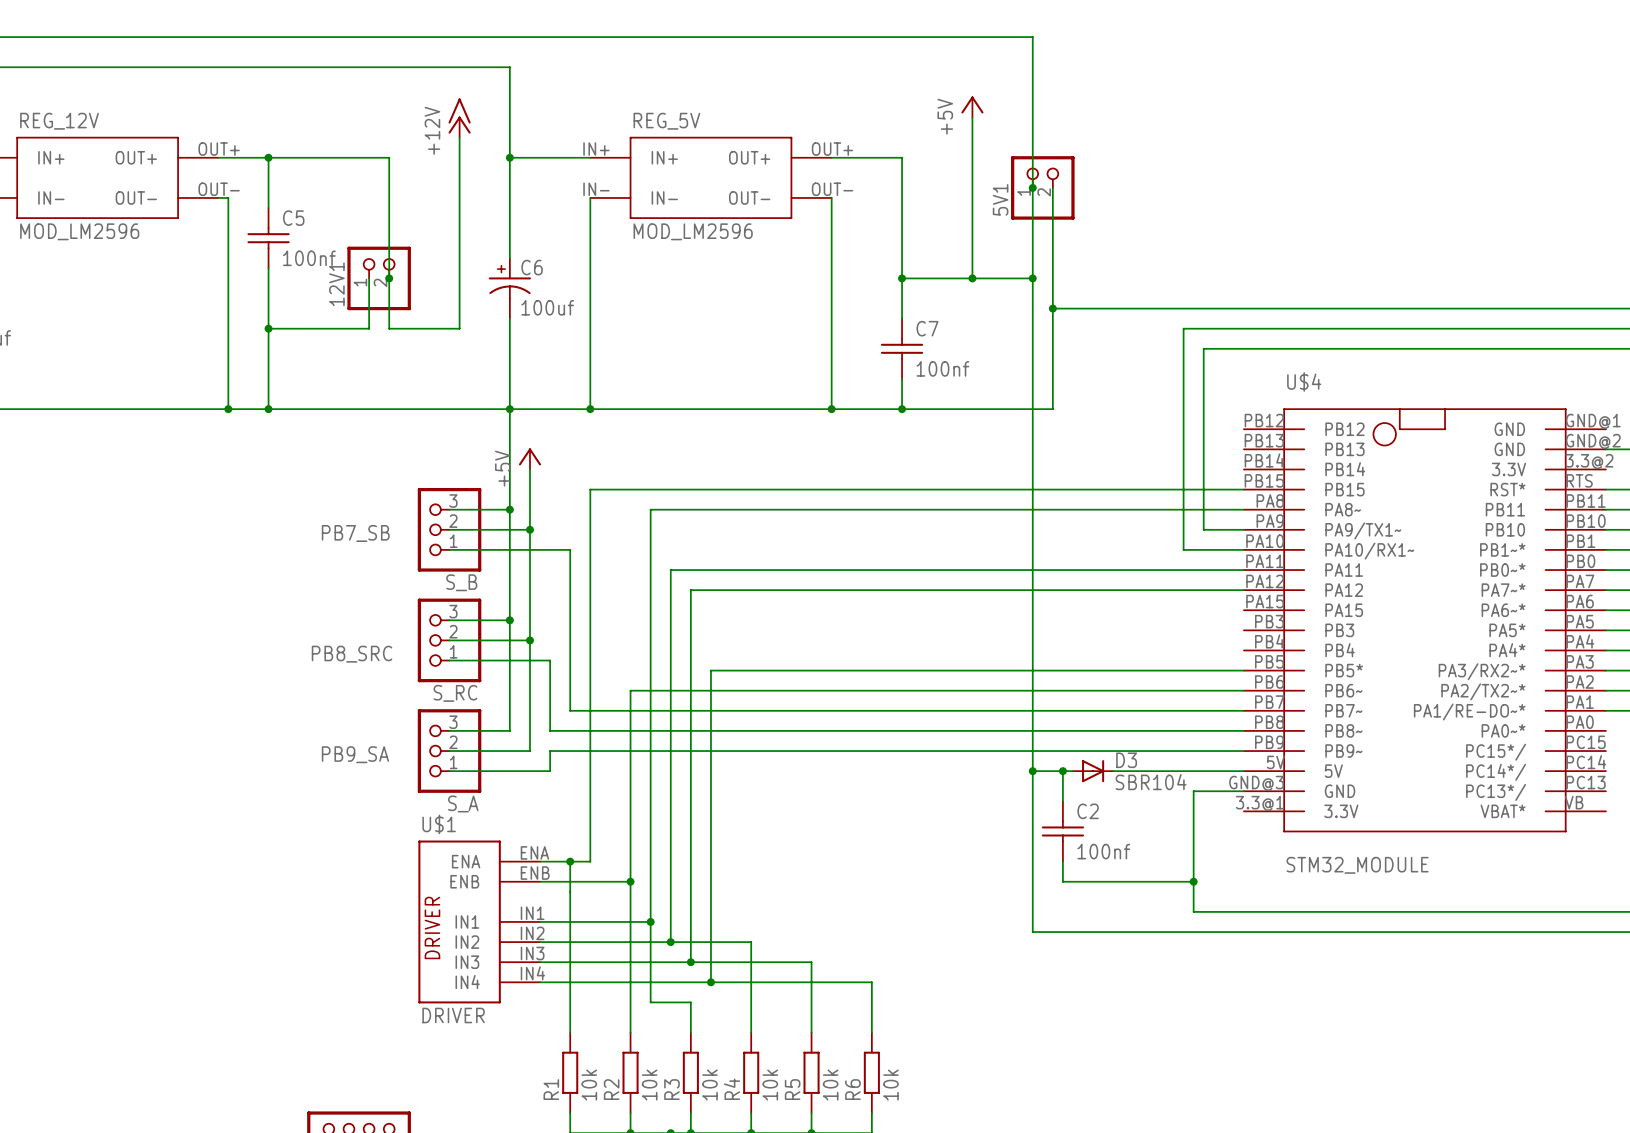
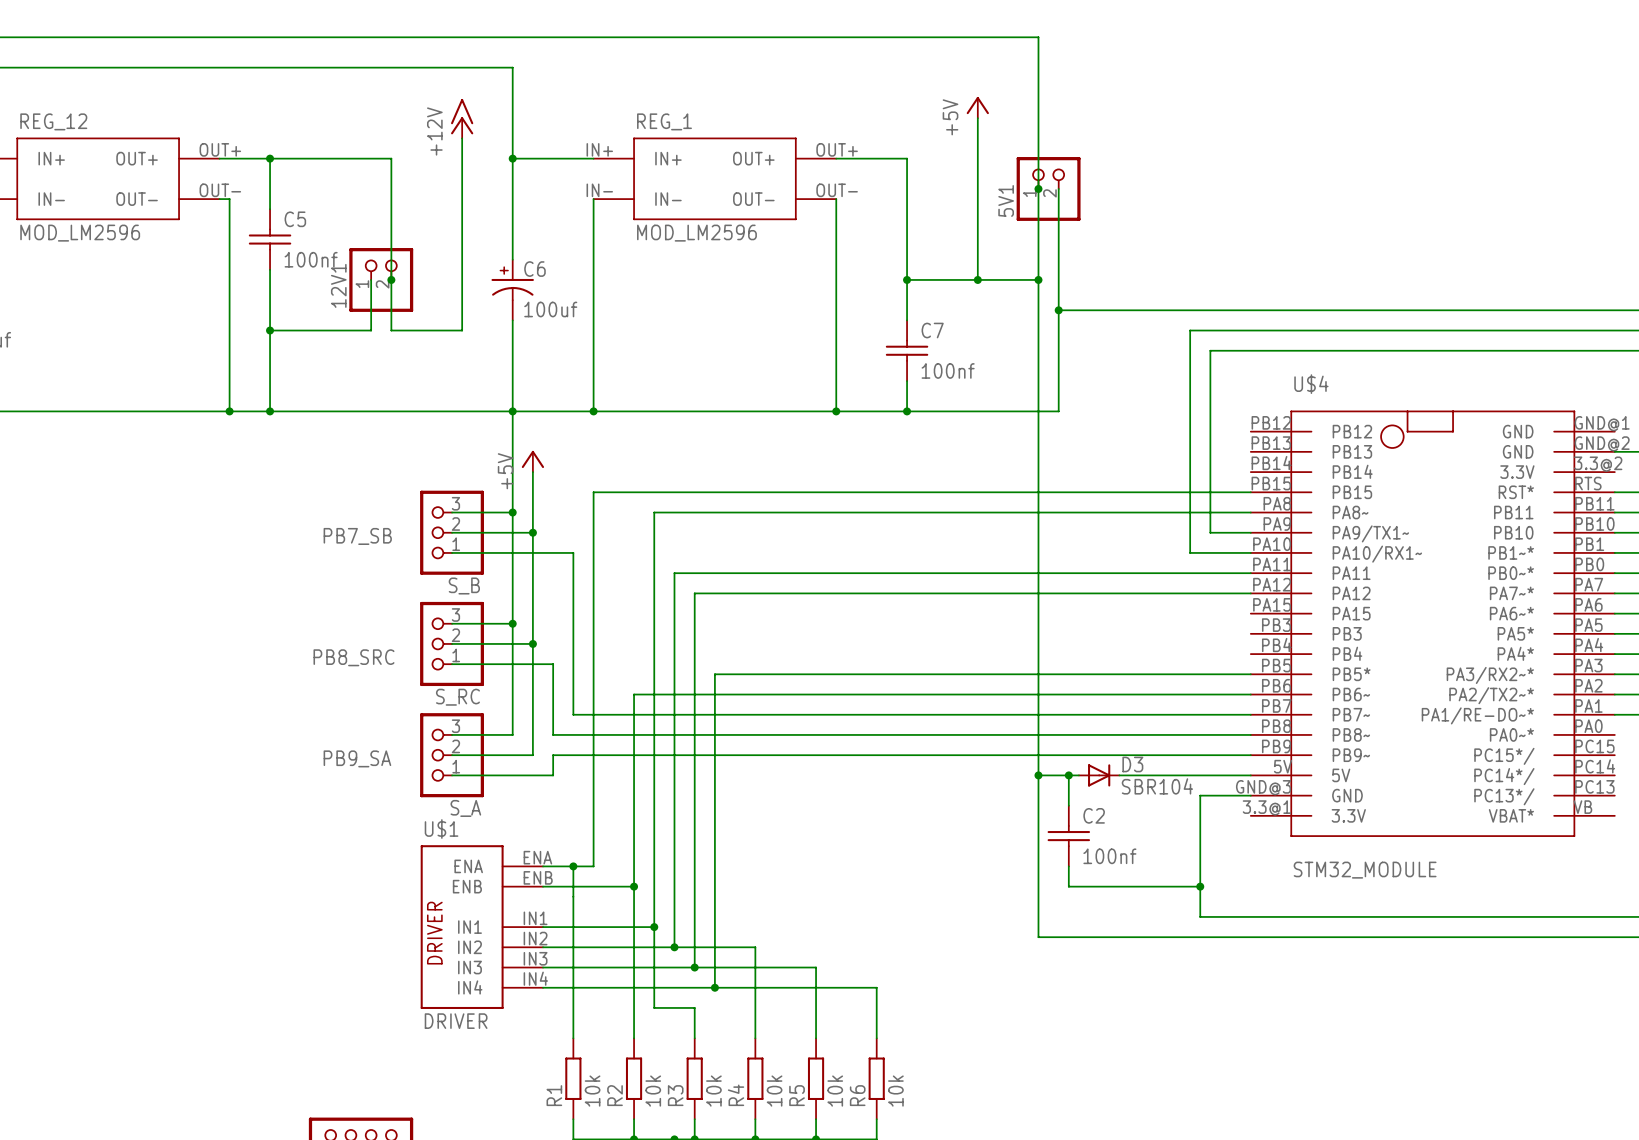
REG_12V name: REG_12V (59, 121) -> REG_12 (53, 121)
REG_5V name: REG_5V (666, 121) -> REG_1 (664, 121)

